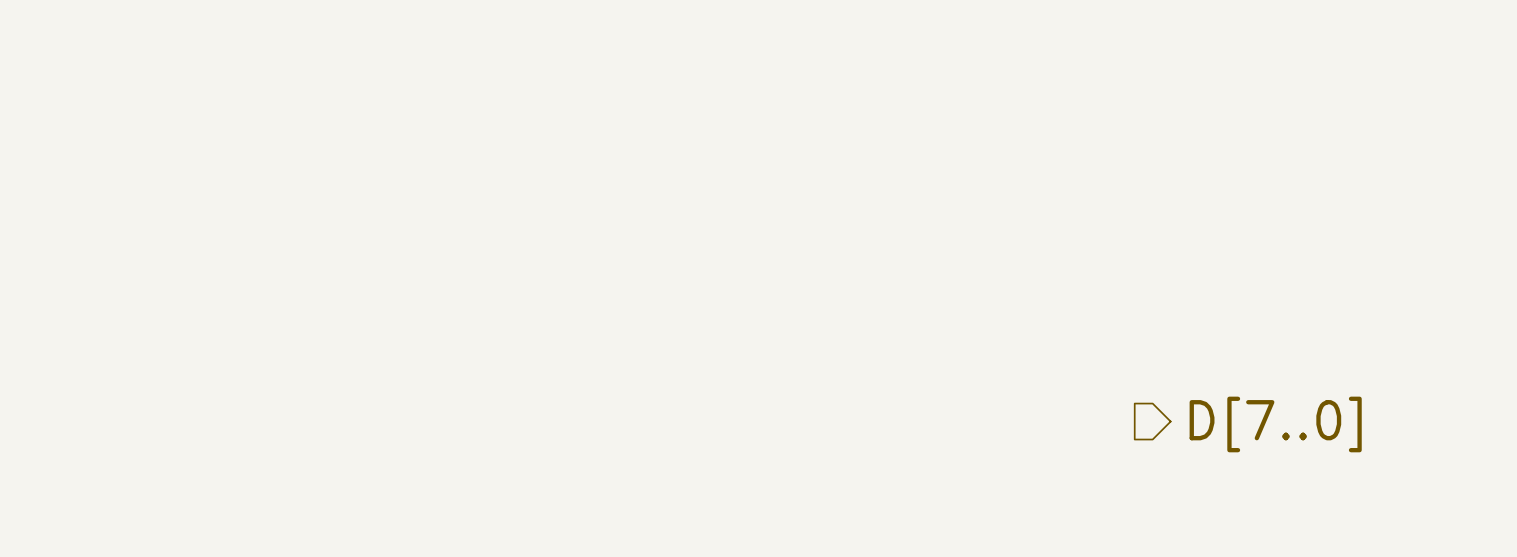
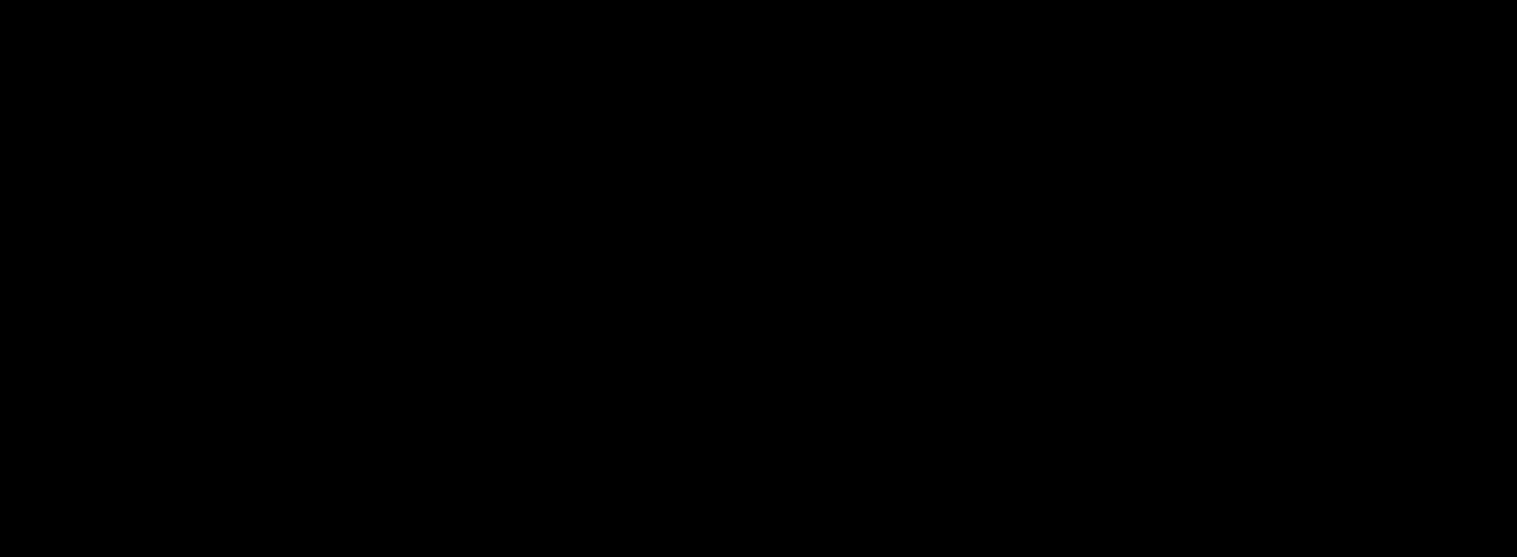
hierarchical label: D[7..0] (1275, 424) -> none

